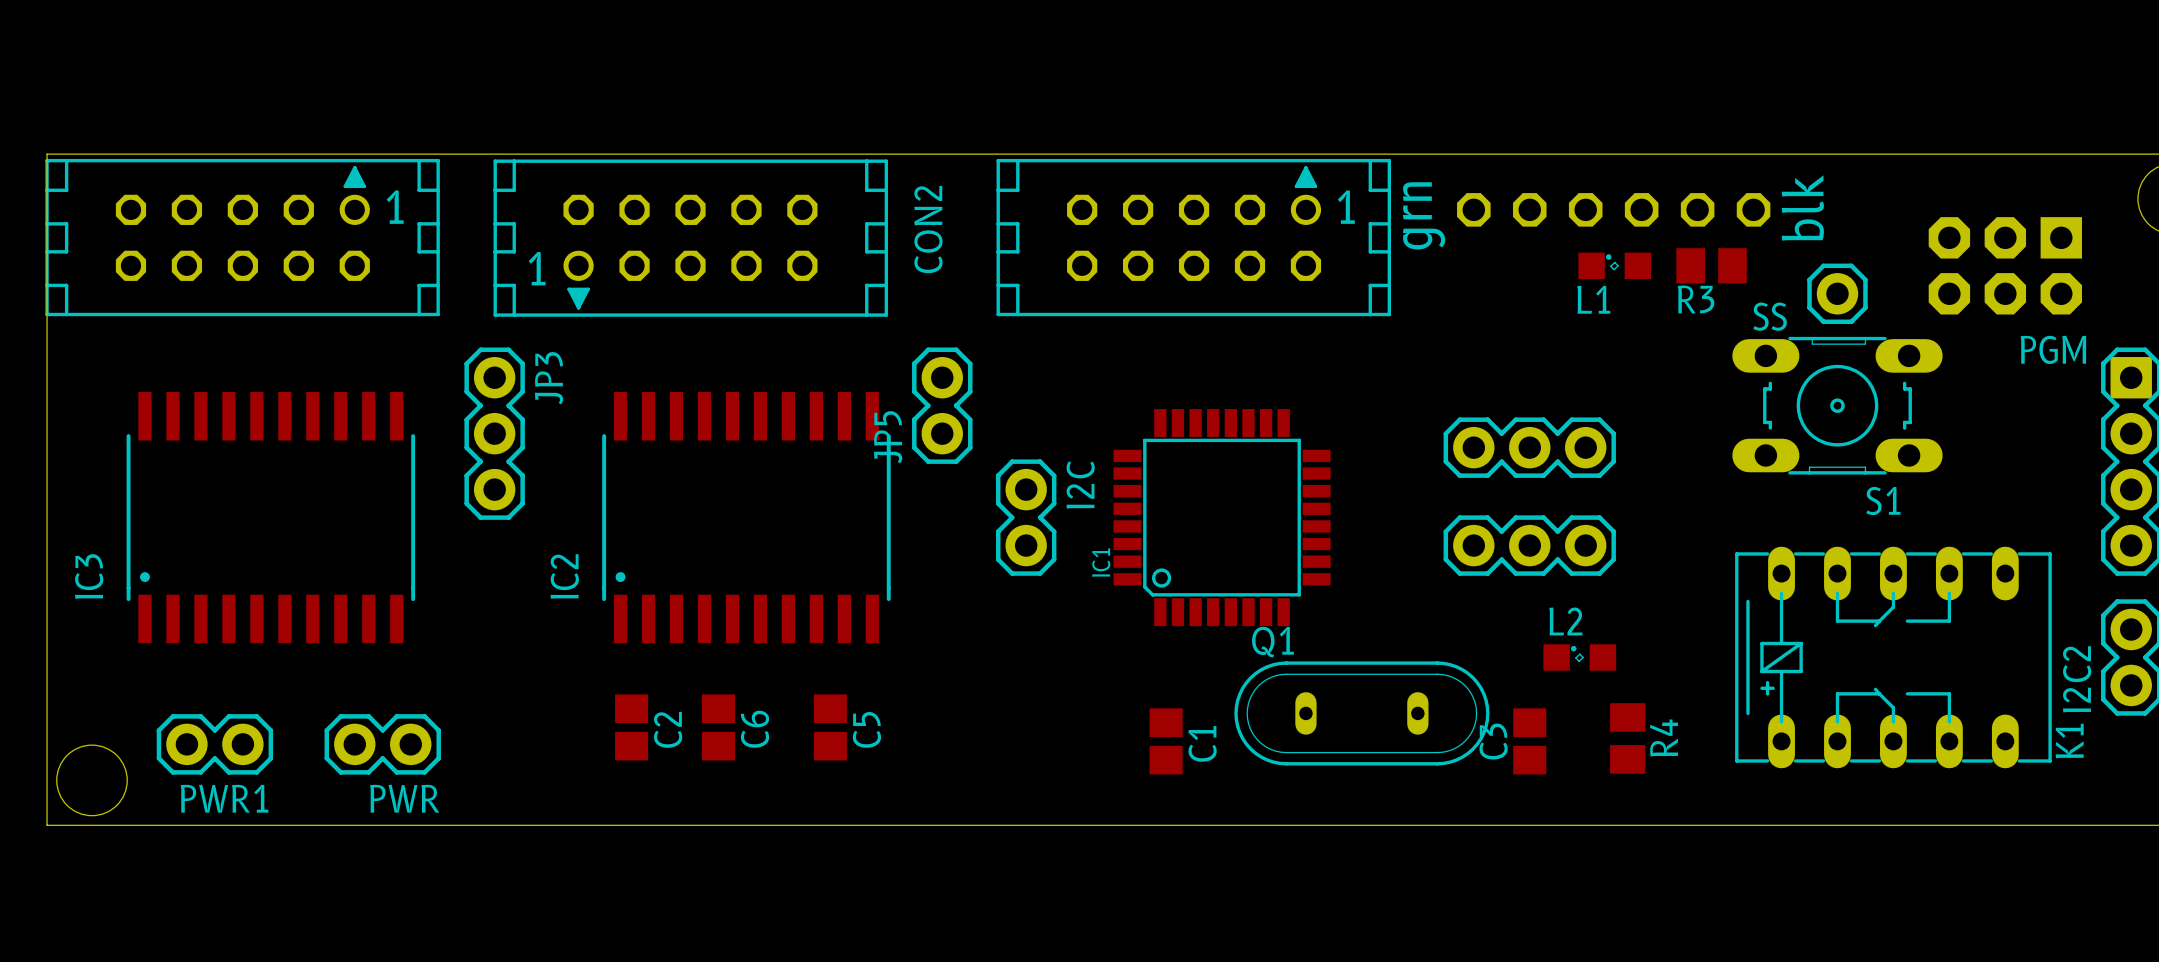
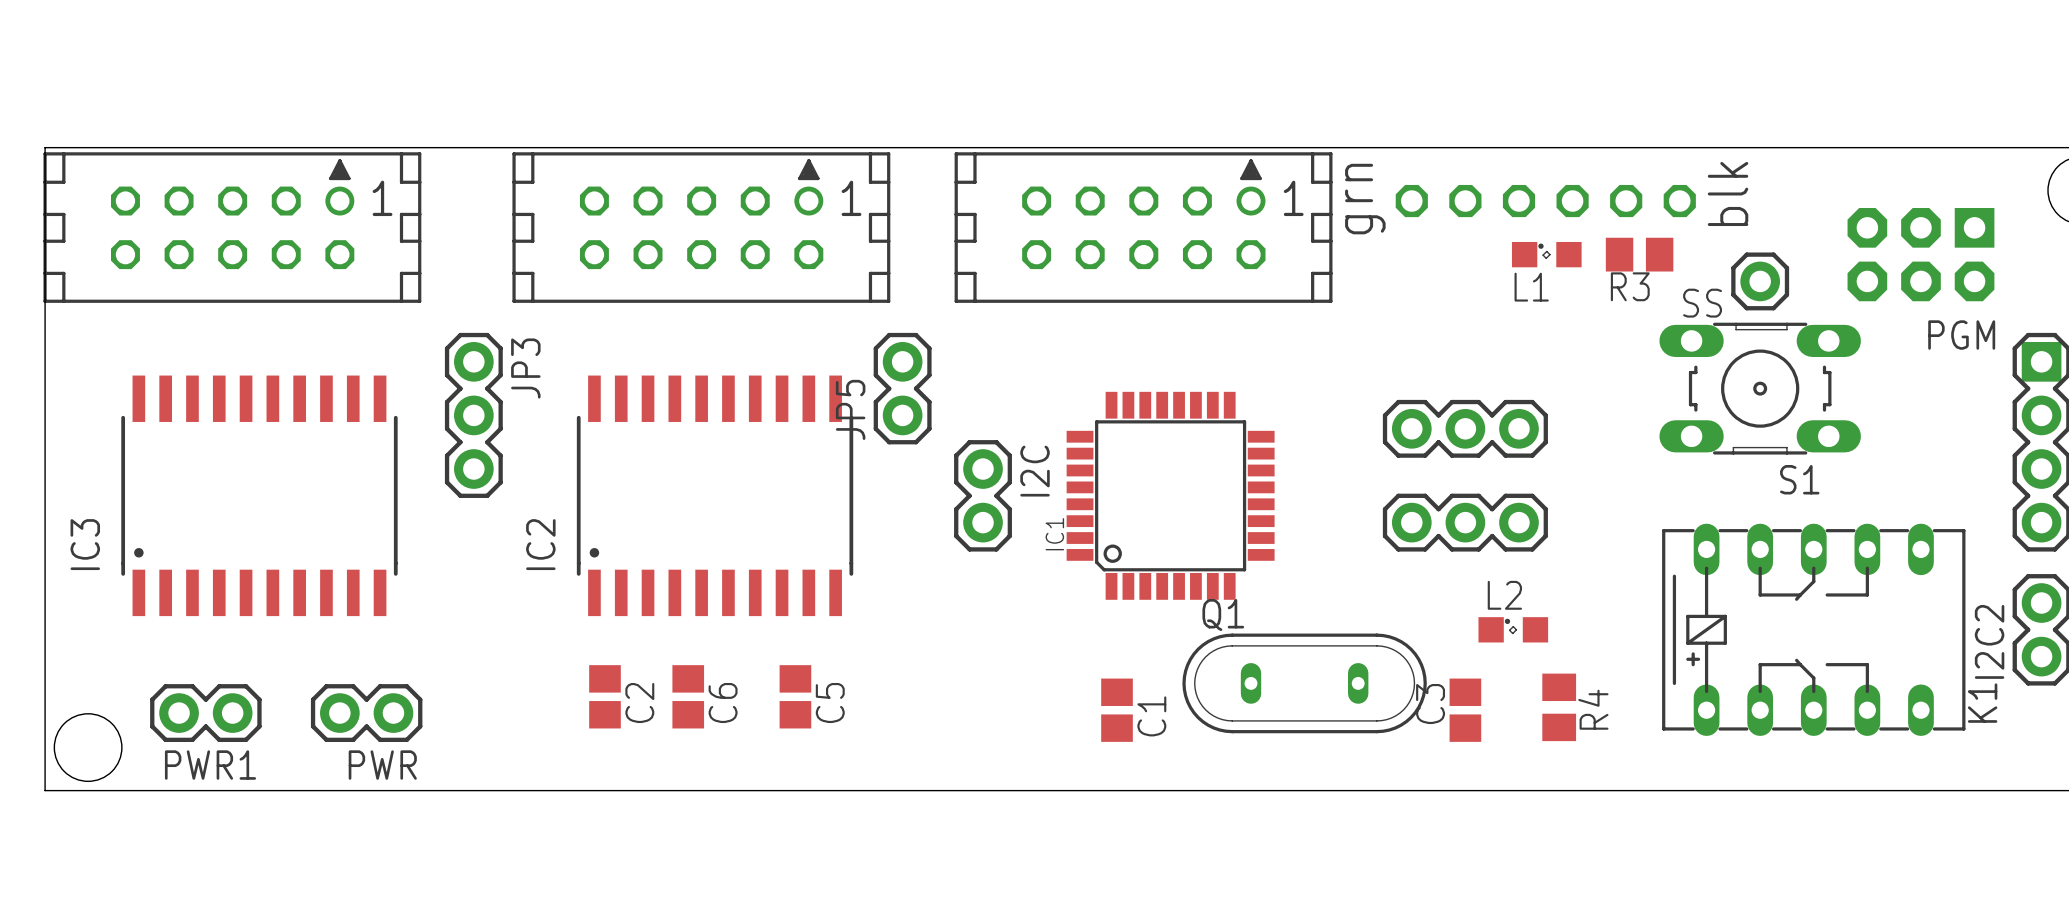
part: none -> (701, 227)
CON2: (690, 238) -> none

